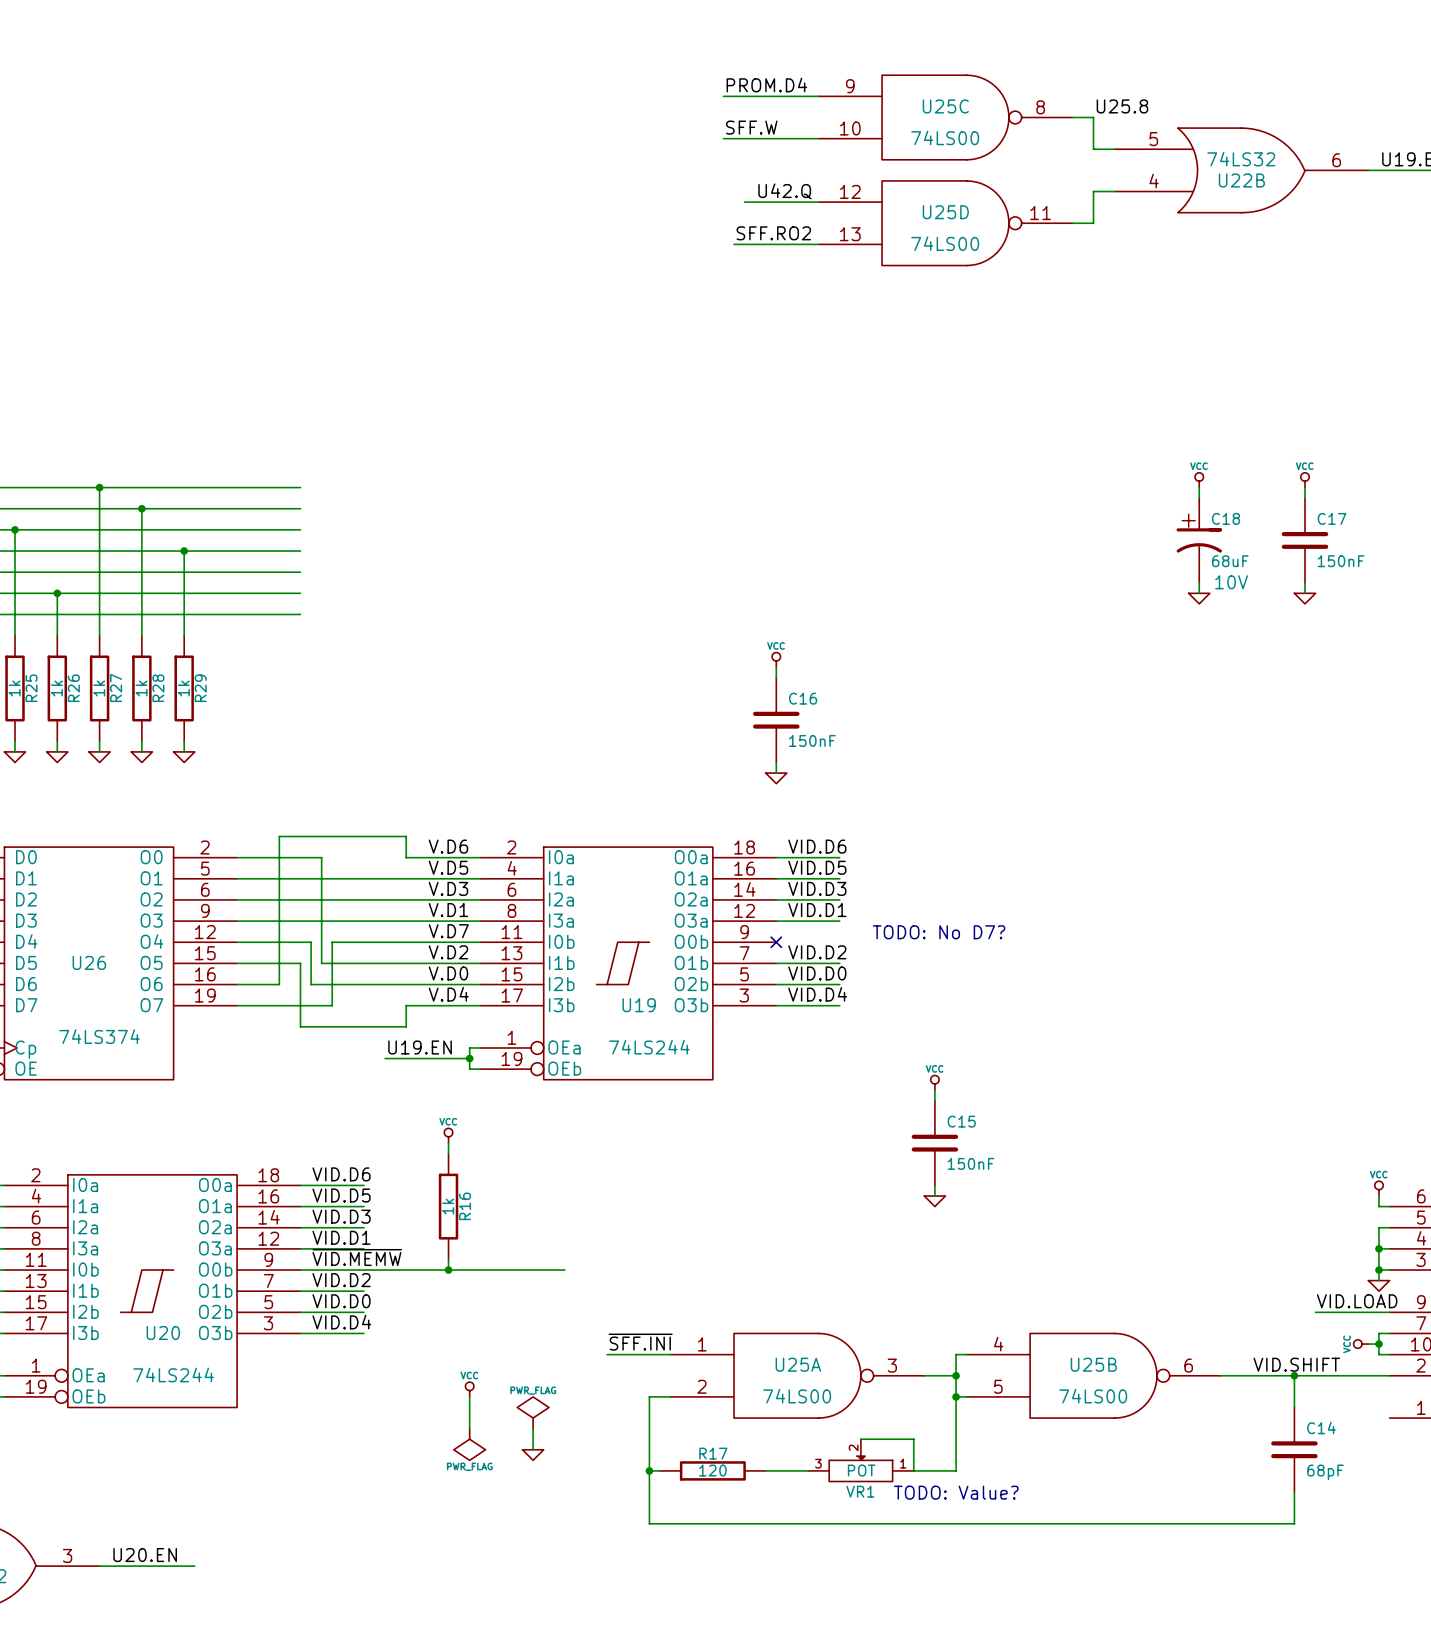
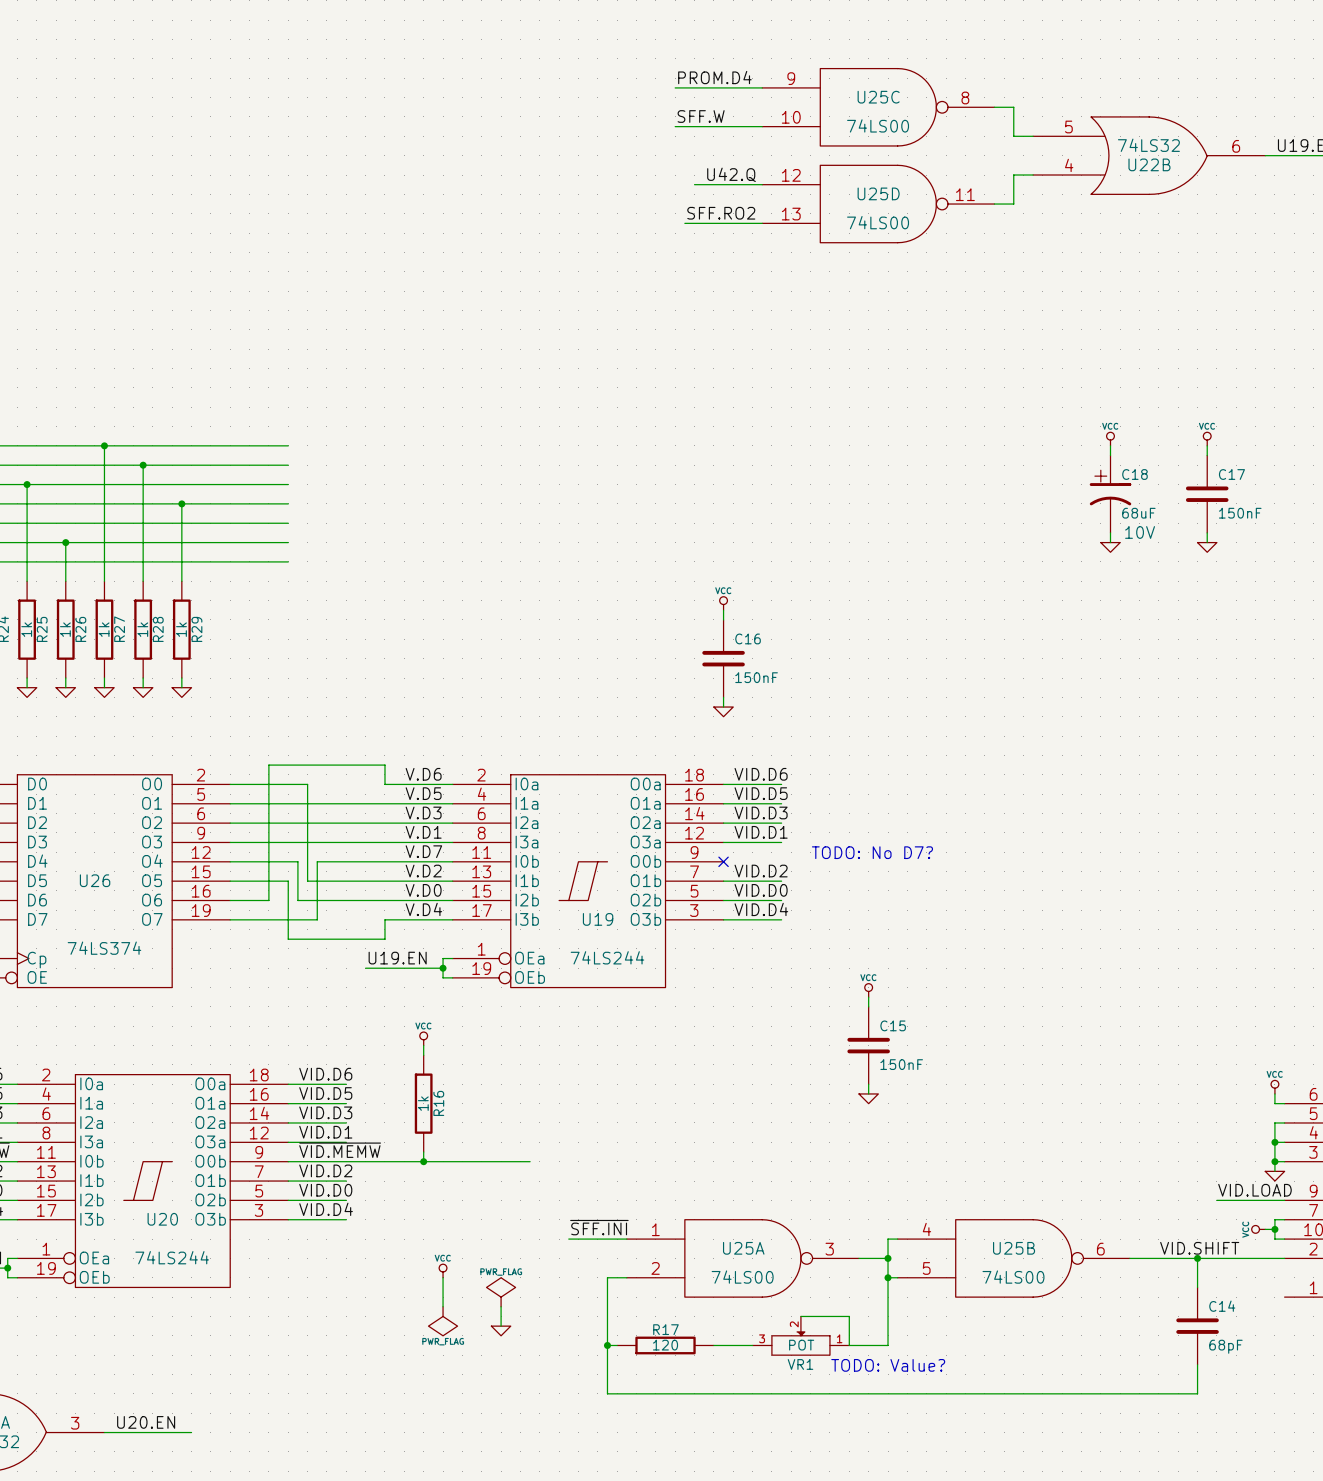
label: U25.8 (1122, 106) -> none

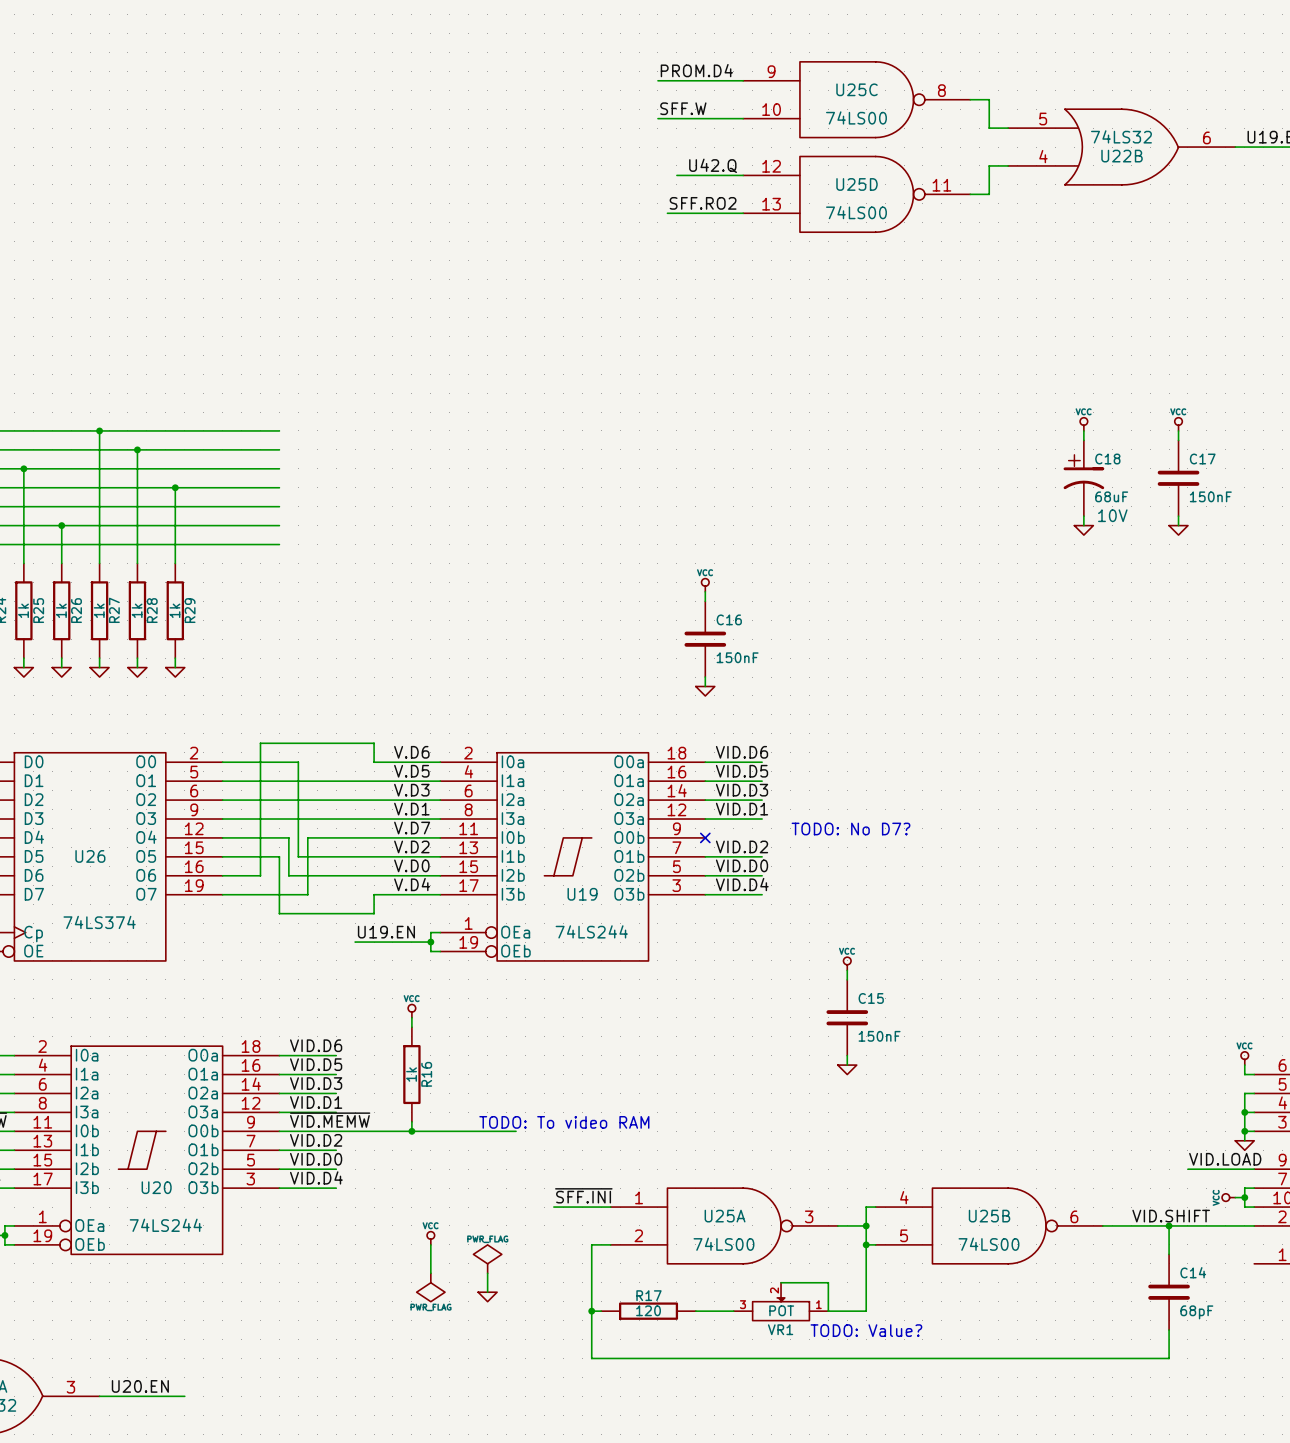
text: none -> TODO: To video RAM (564, 1122)

